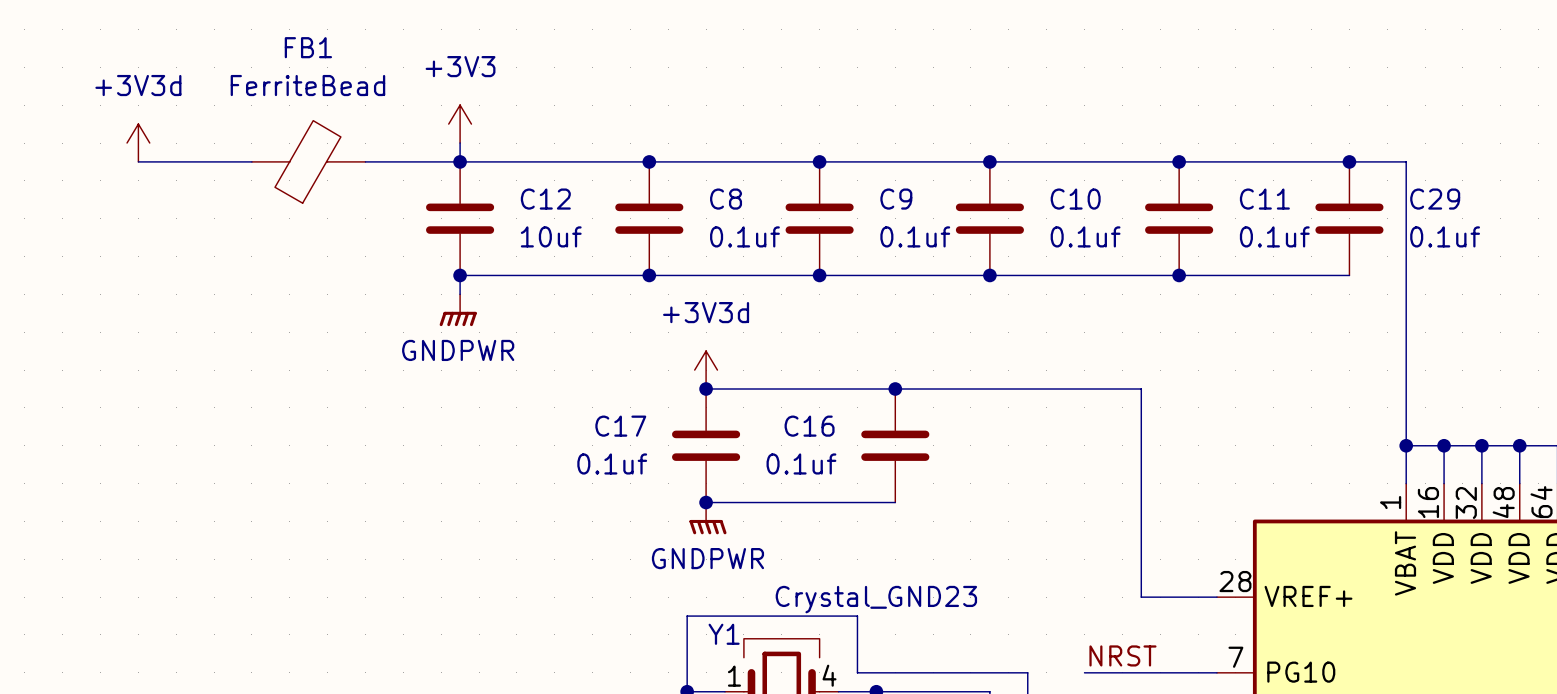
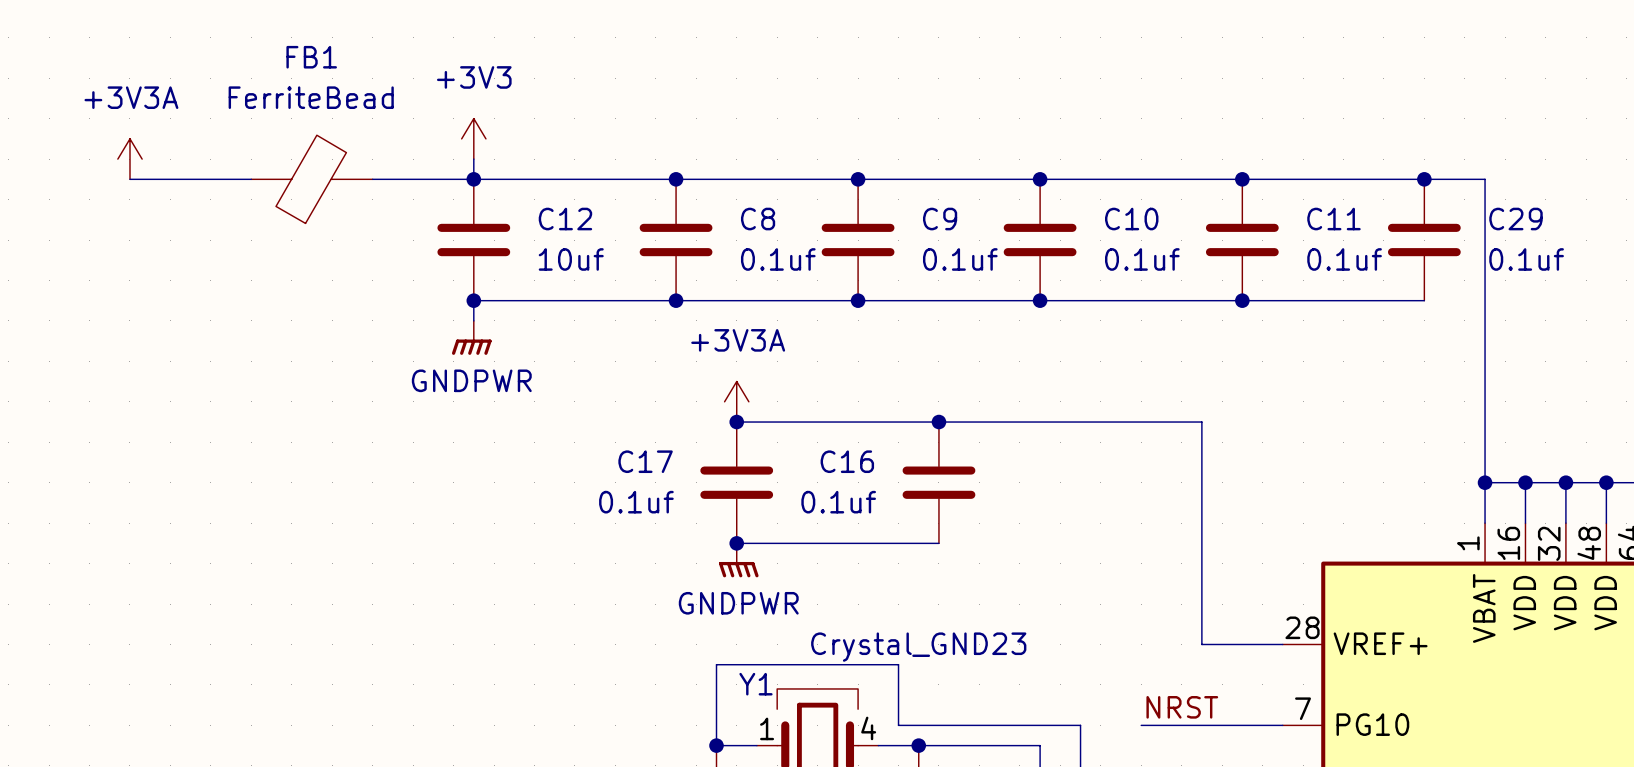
power symbol: +3V3d (138, 143) -> +3V3A (129, 159)
power symbol: +3V3d (706, 370) -> +3V3A (736, 401)

